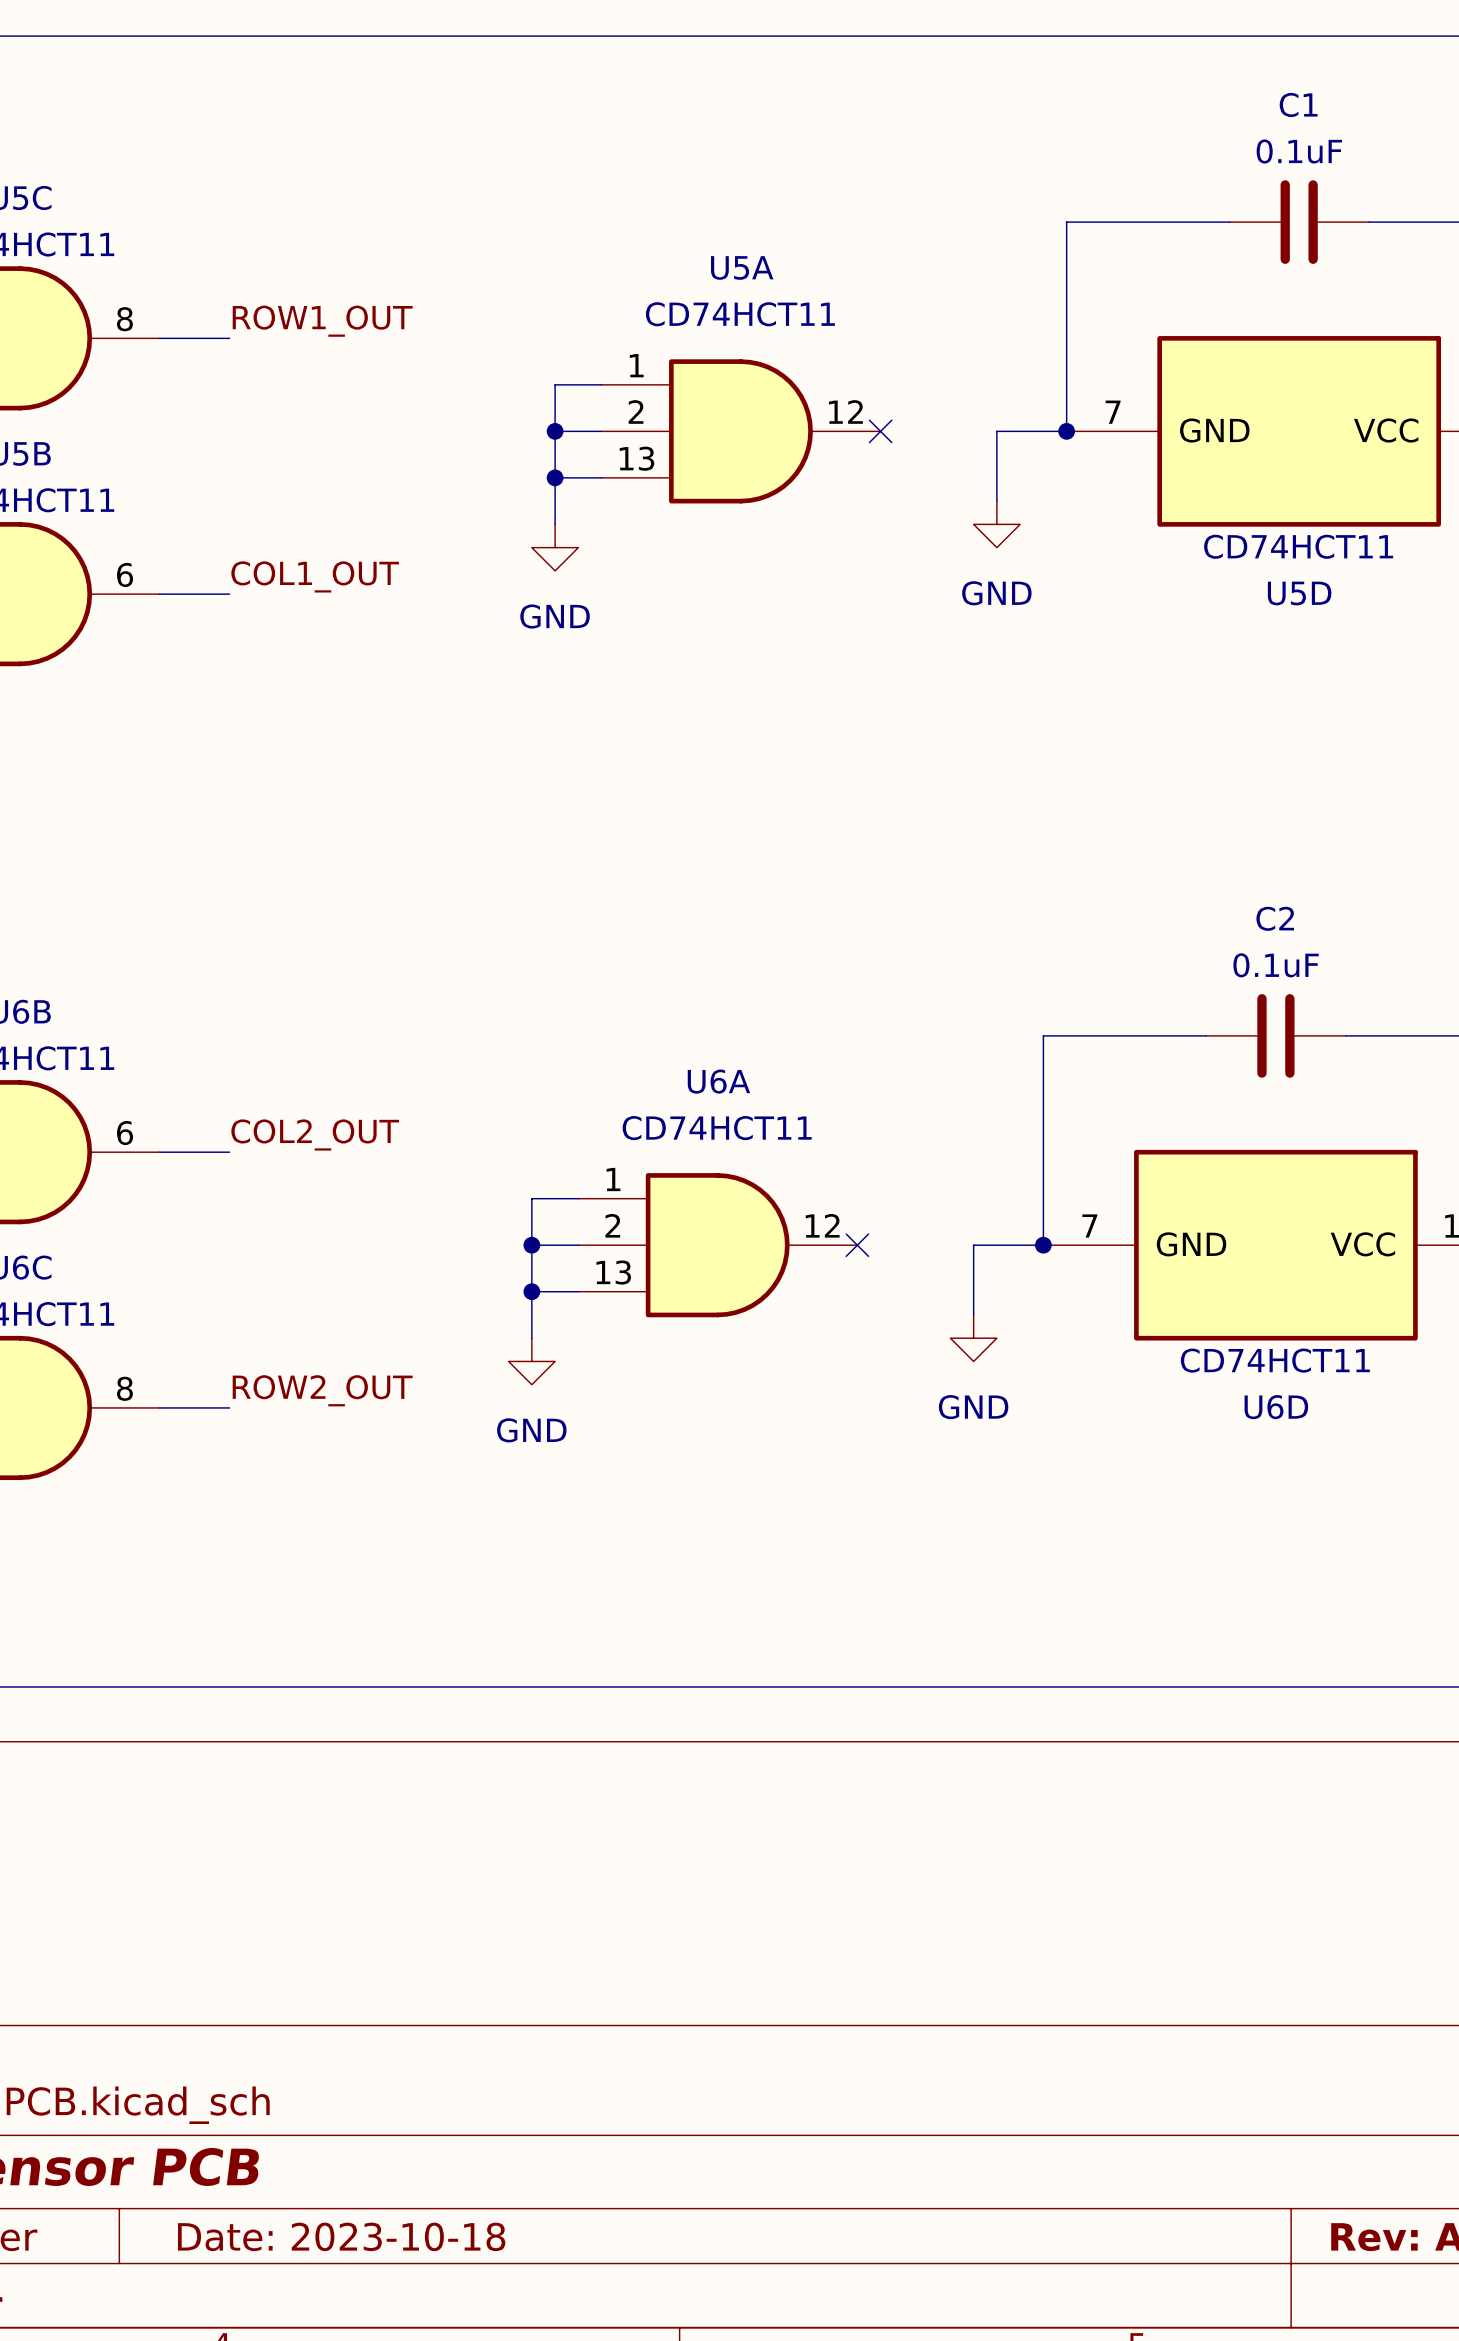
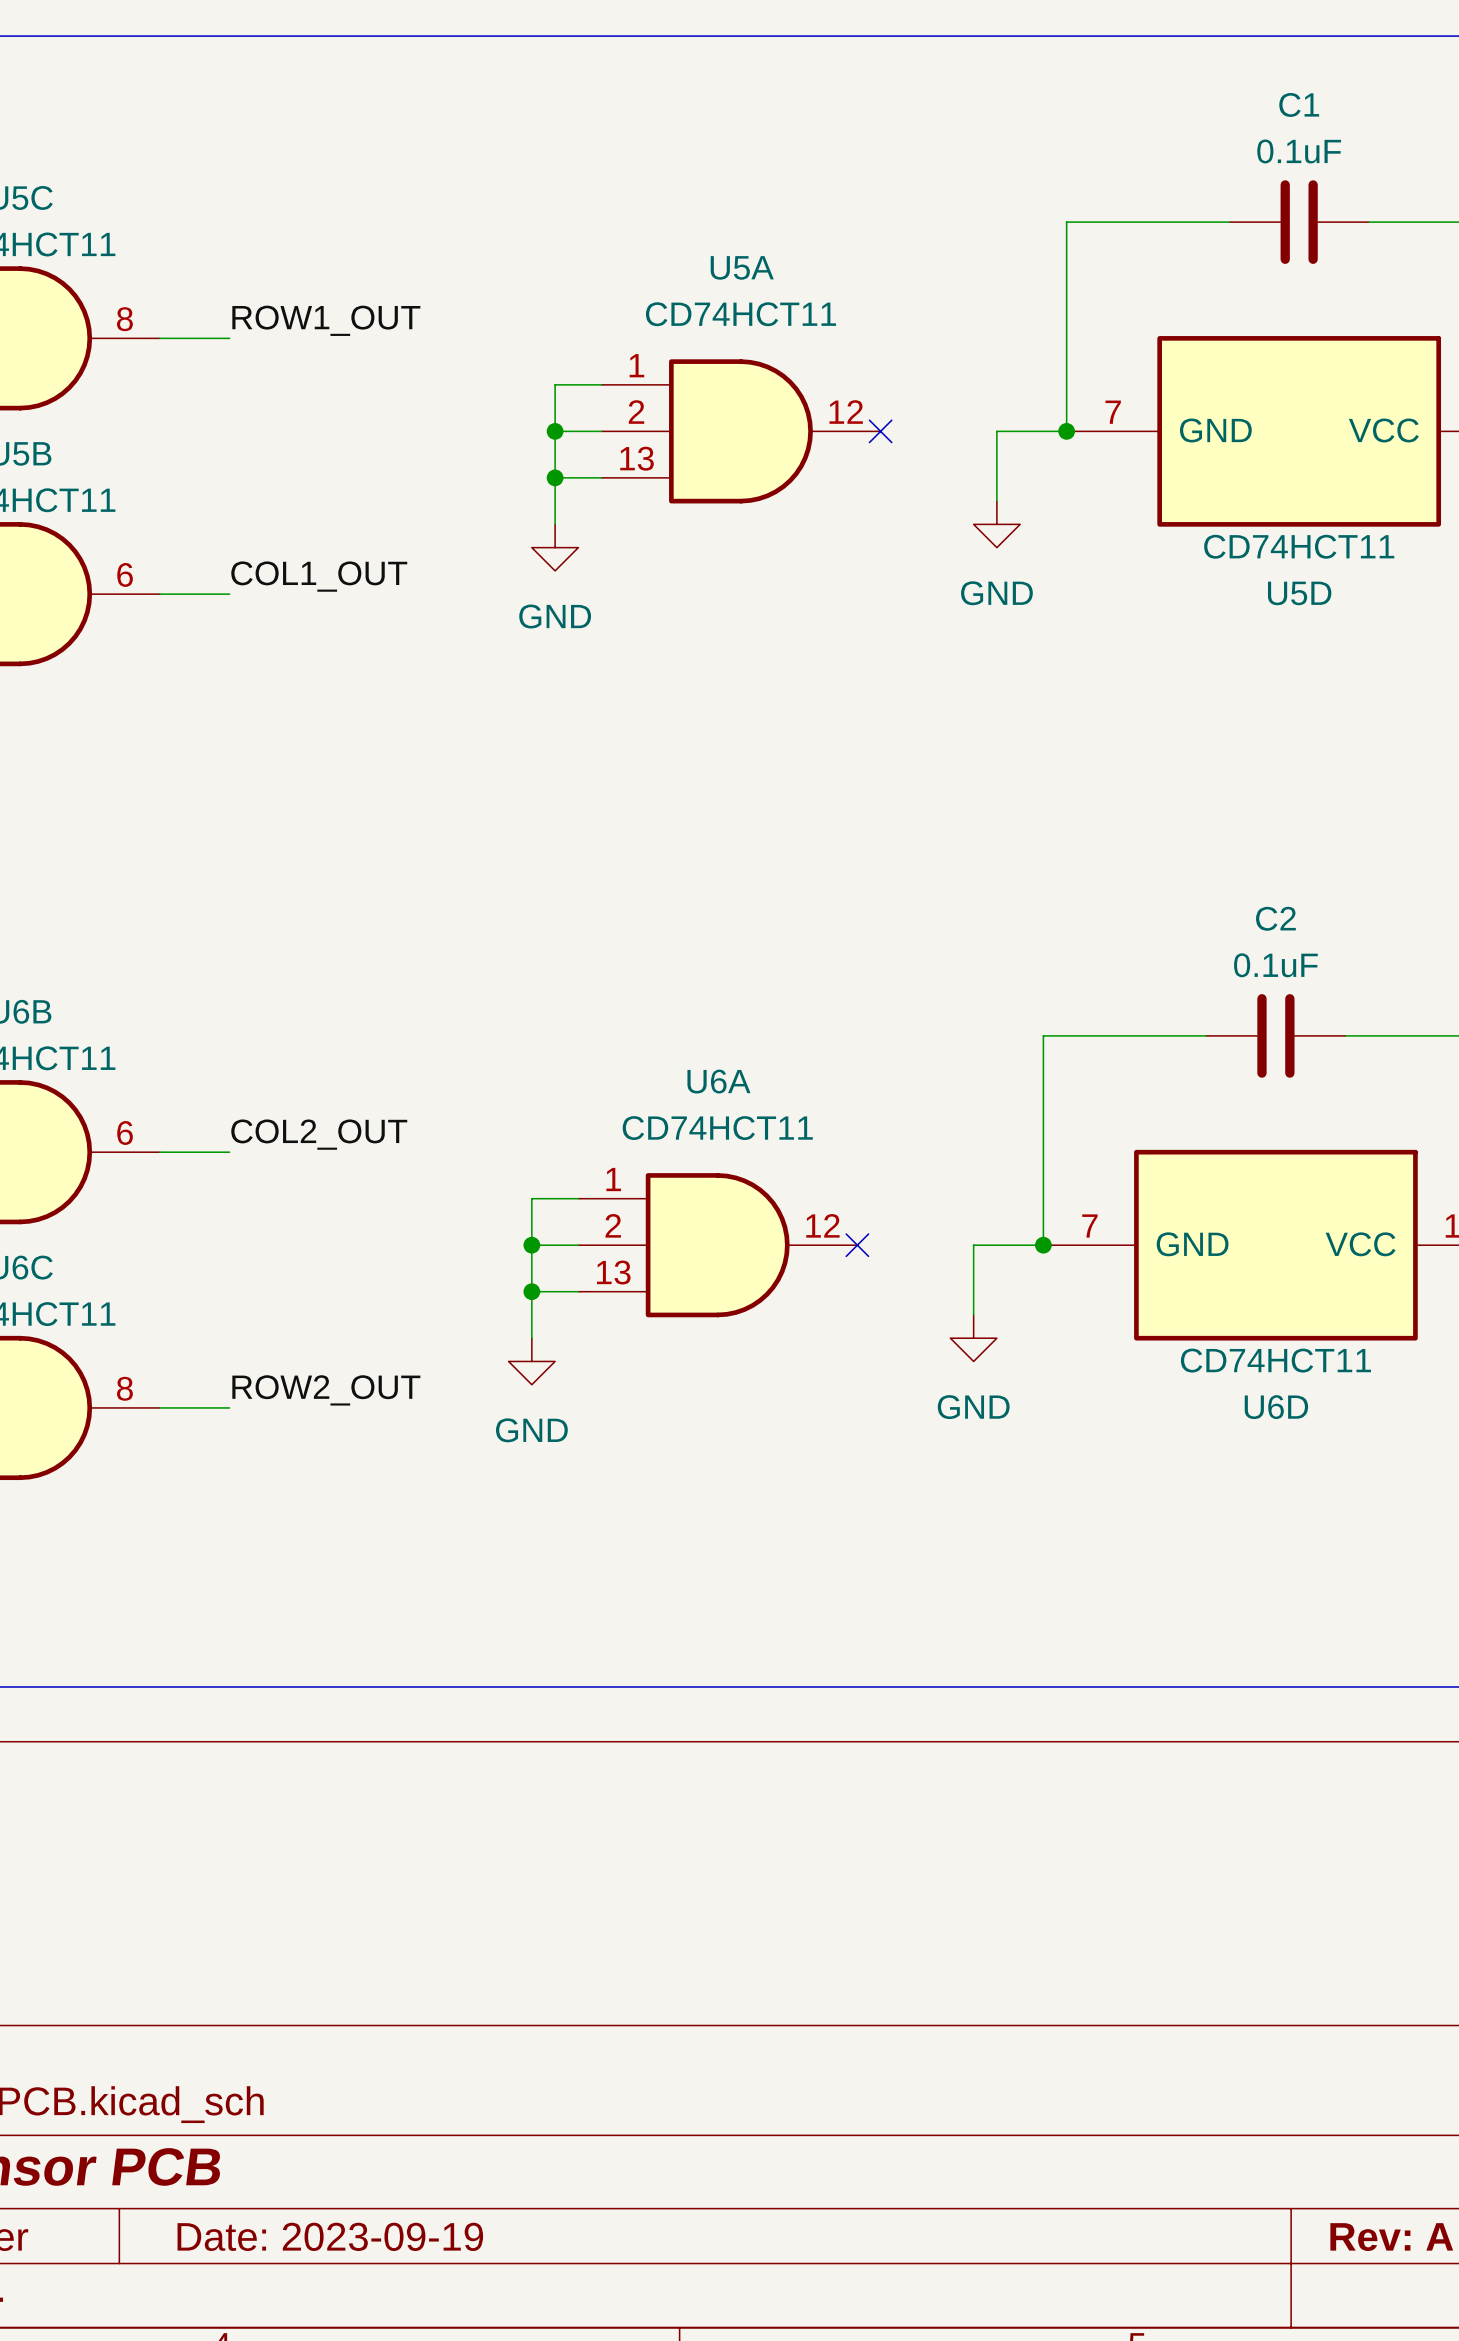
title block: Date: 2023-10-18 (341, 2236) -> Date: 2023-09-19 (330, 2236)

